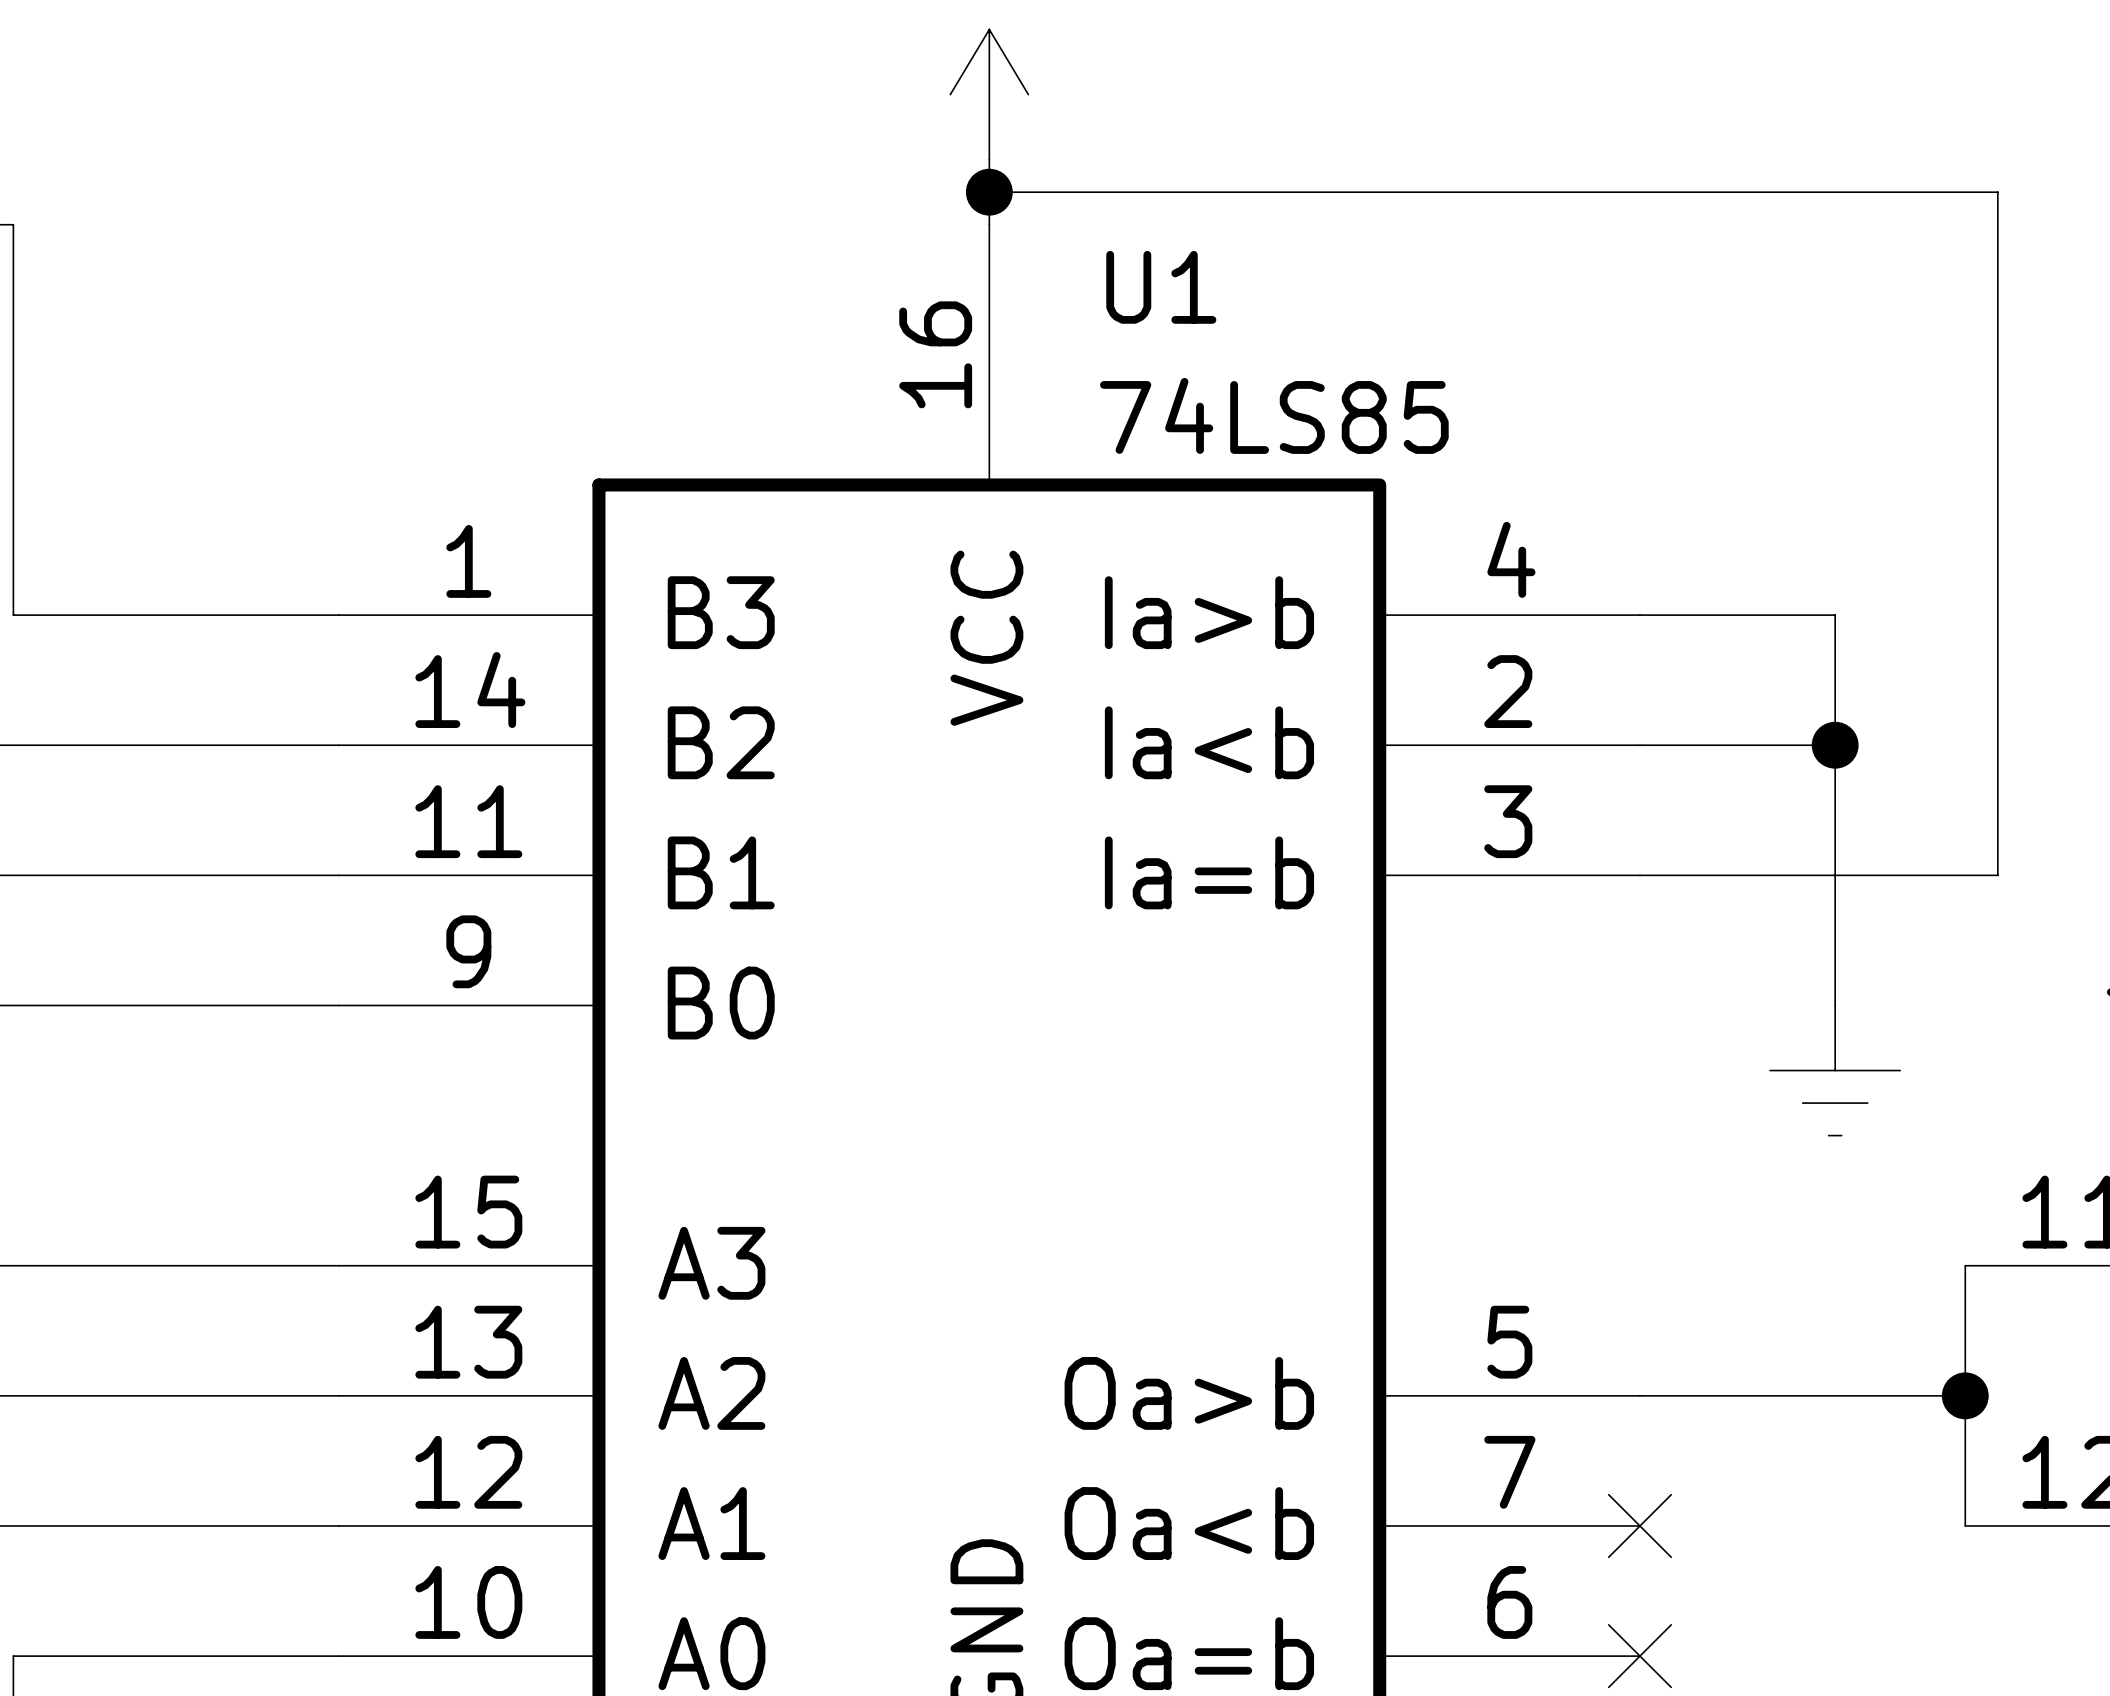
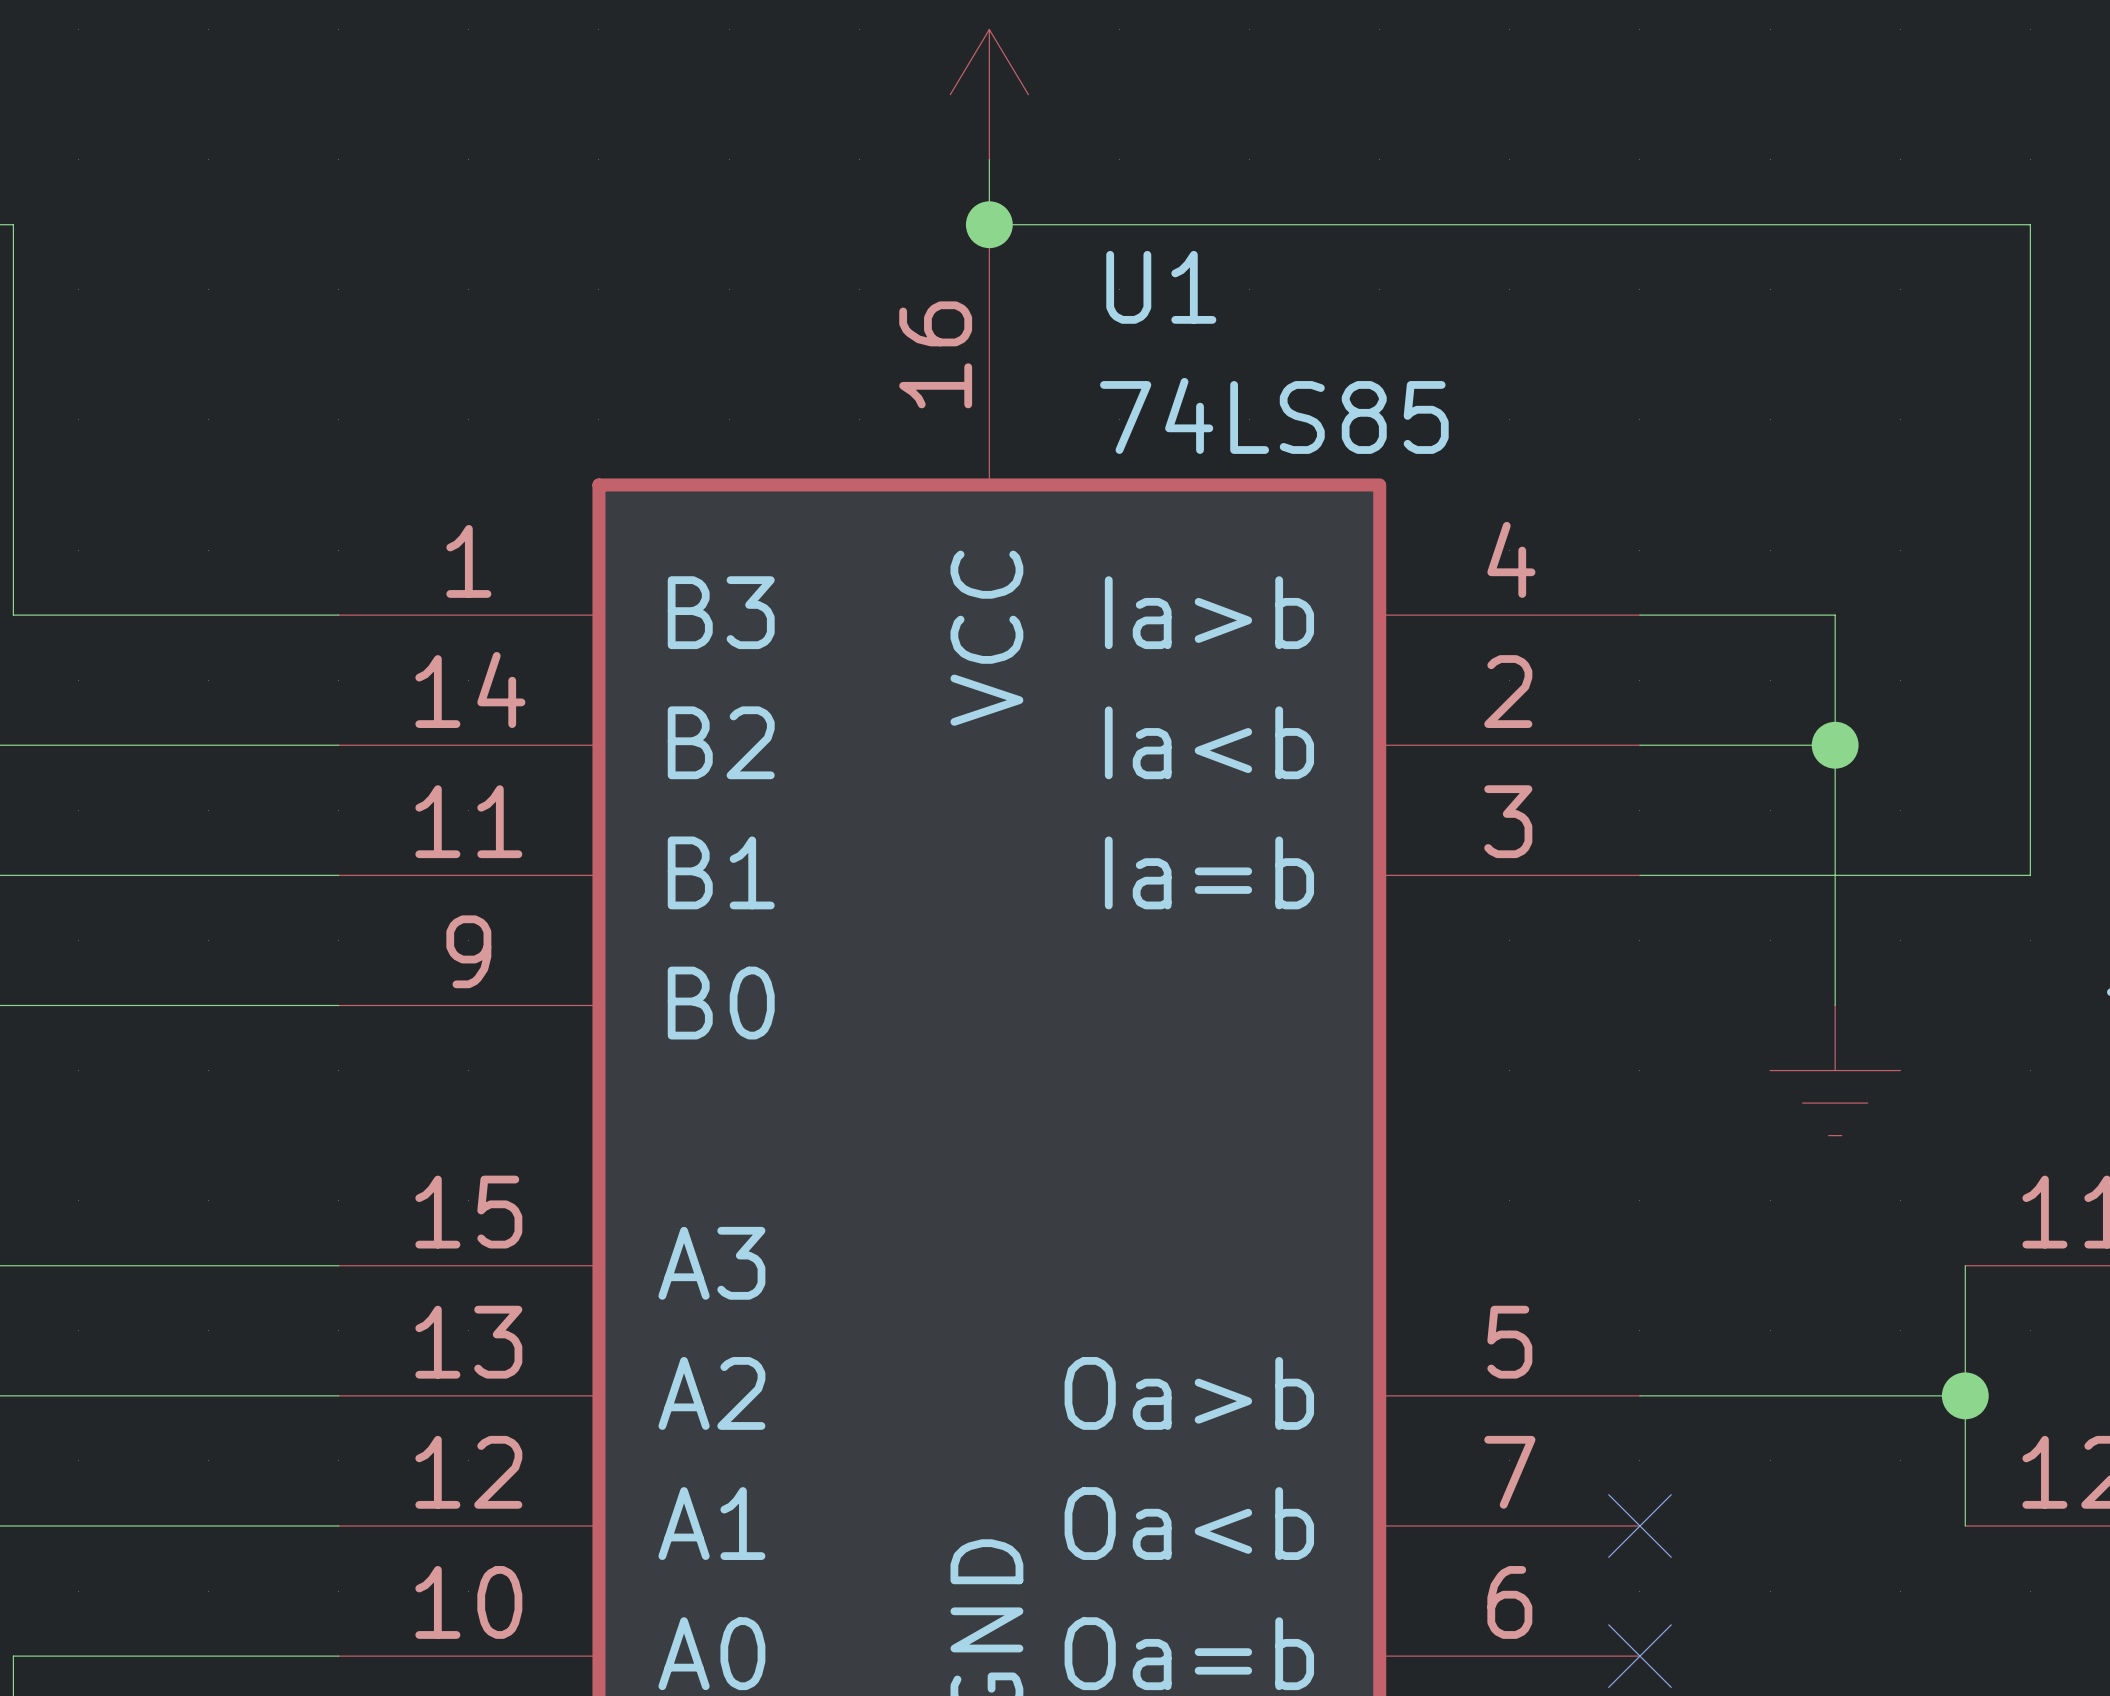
wire: (989, 192) (1997, 192) (1997, 875) -> (989, 224) (2030, 224) (2030, 875) (1997, 875)
junction position: (989, 192) -> (989, 224)

